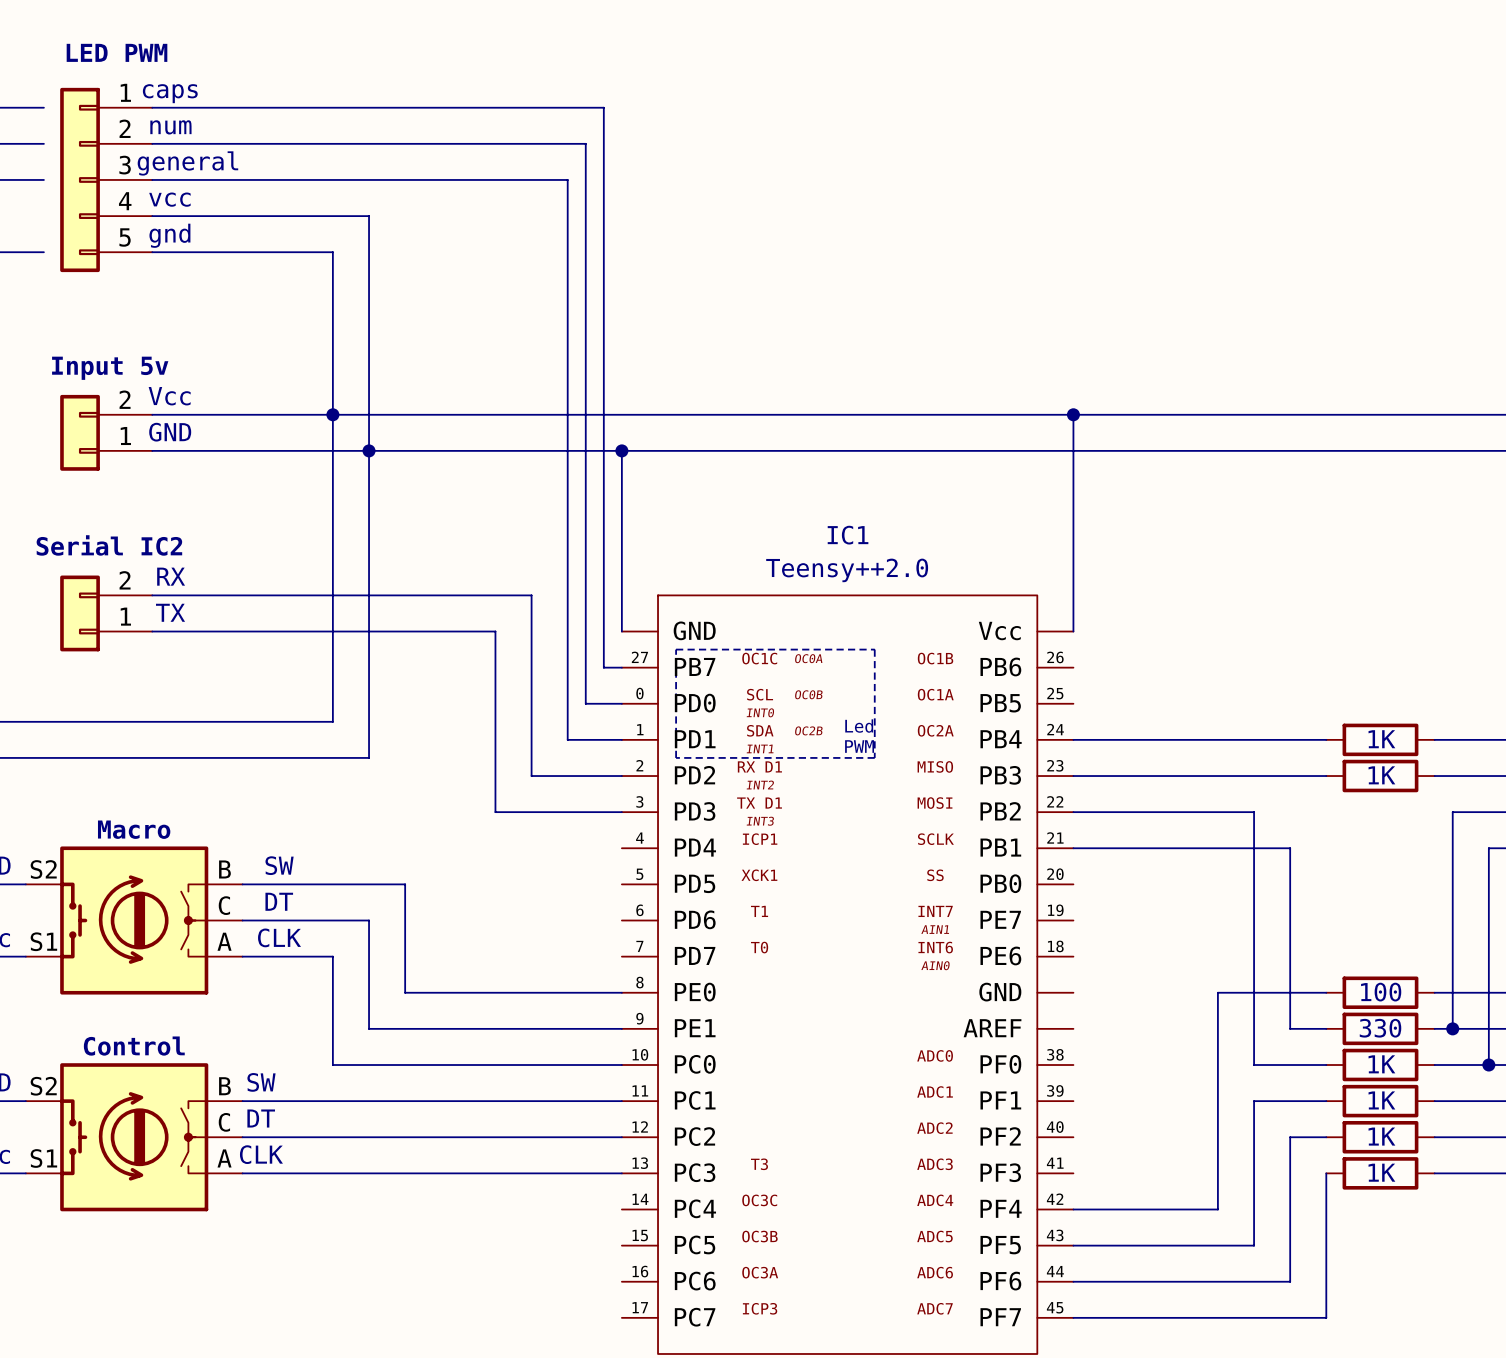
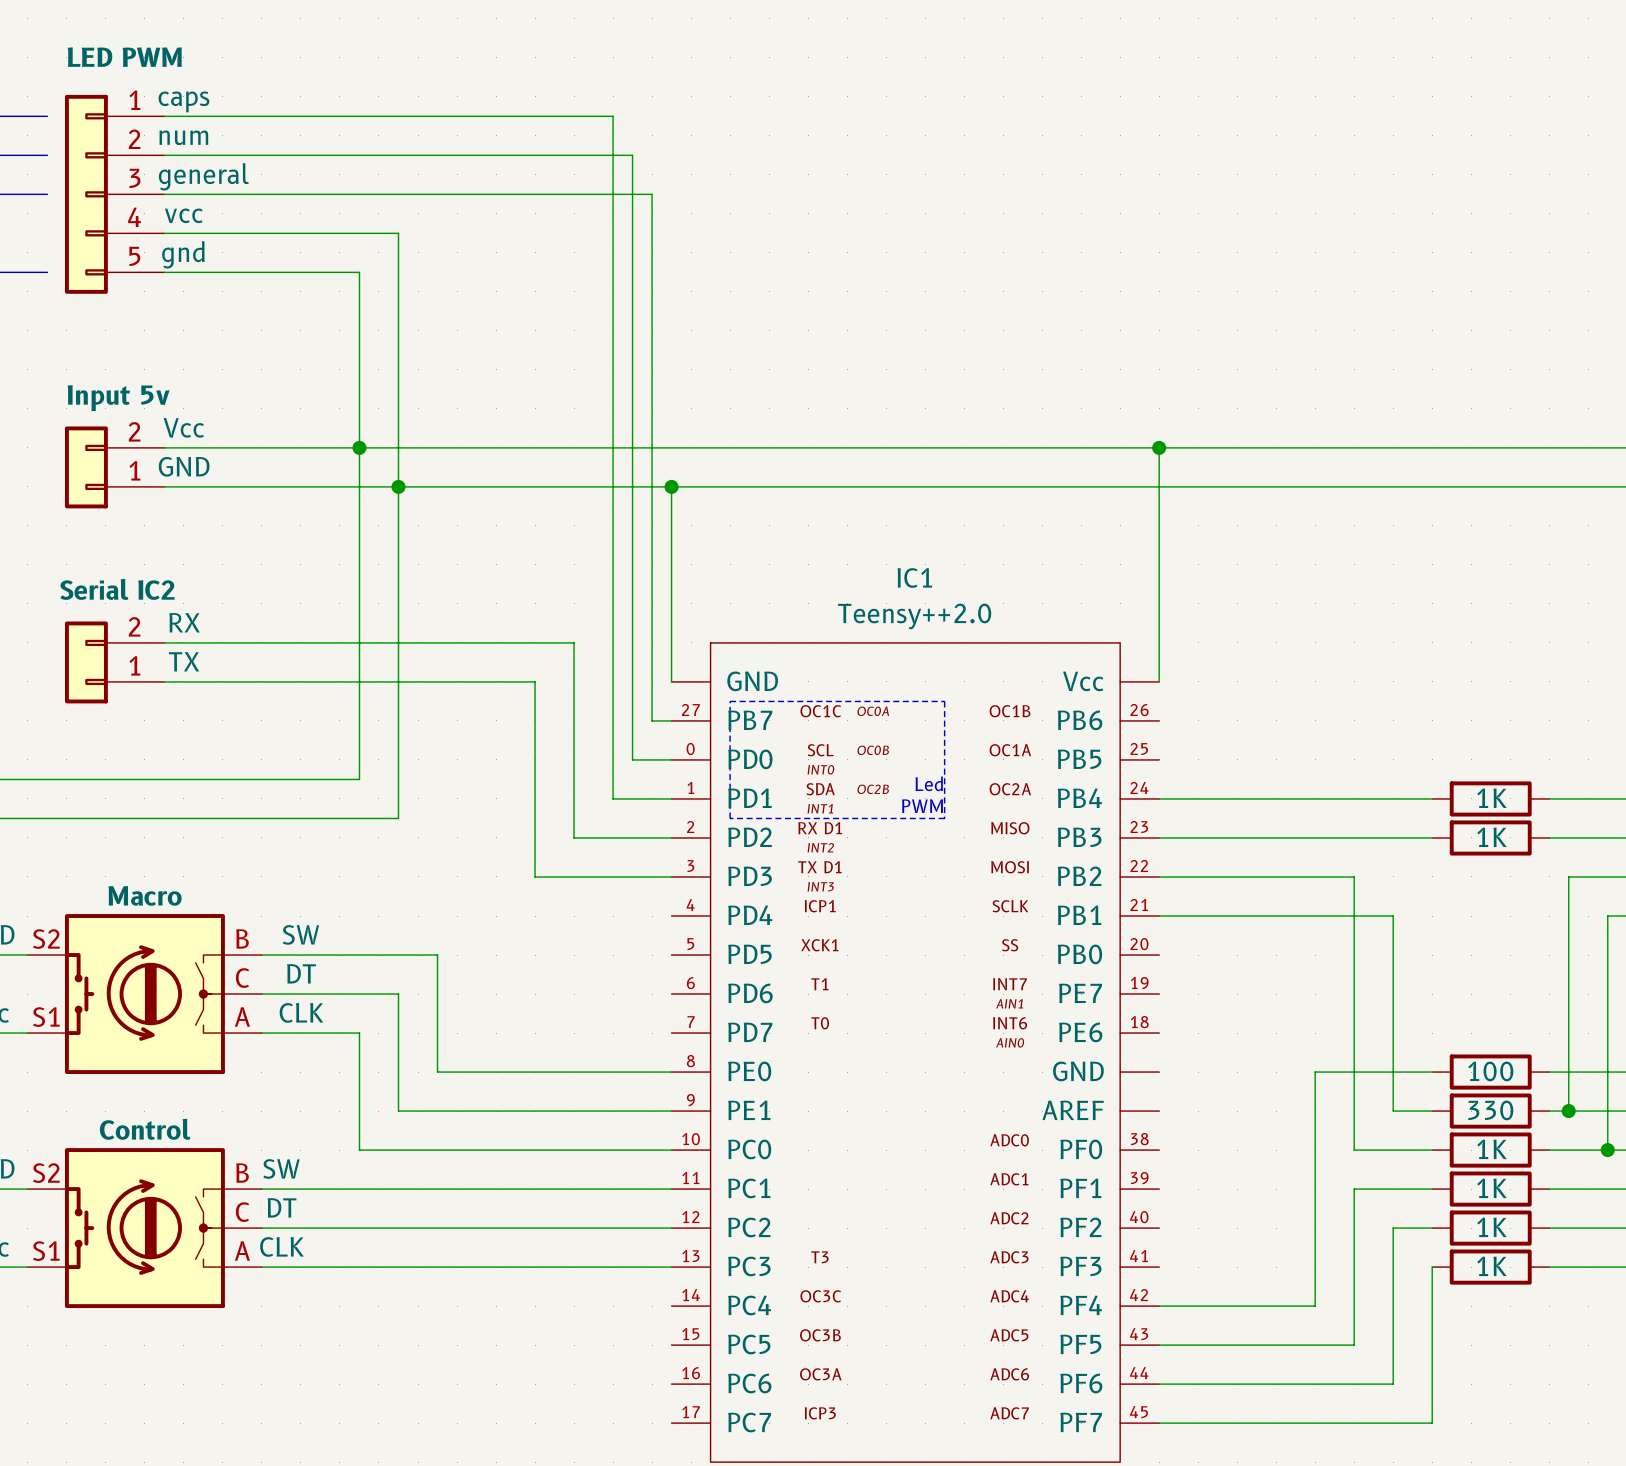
wire: (567, 107) (603, 107) (603, 179) -> (613, 116) (613, 194) (652, 194)

